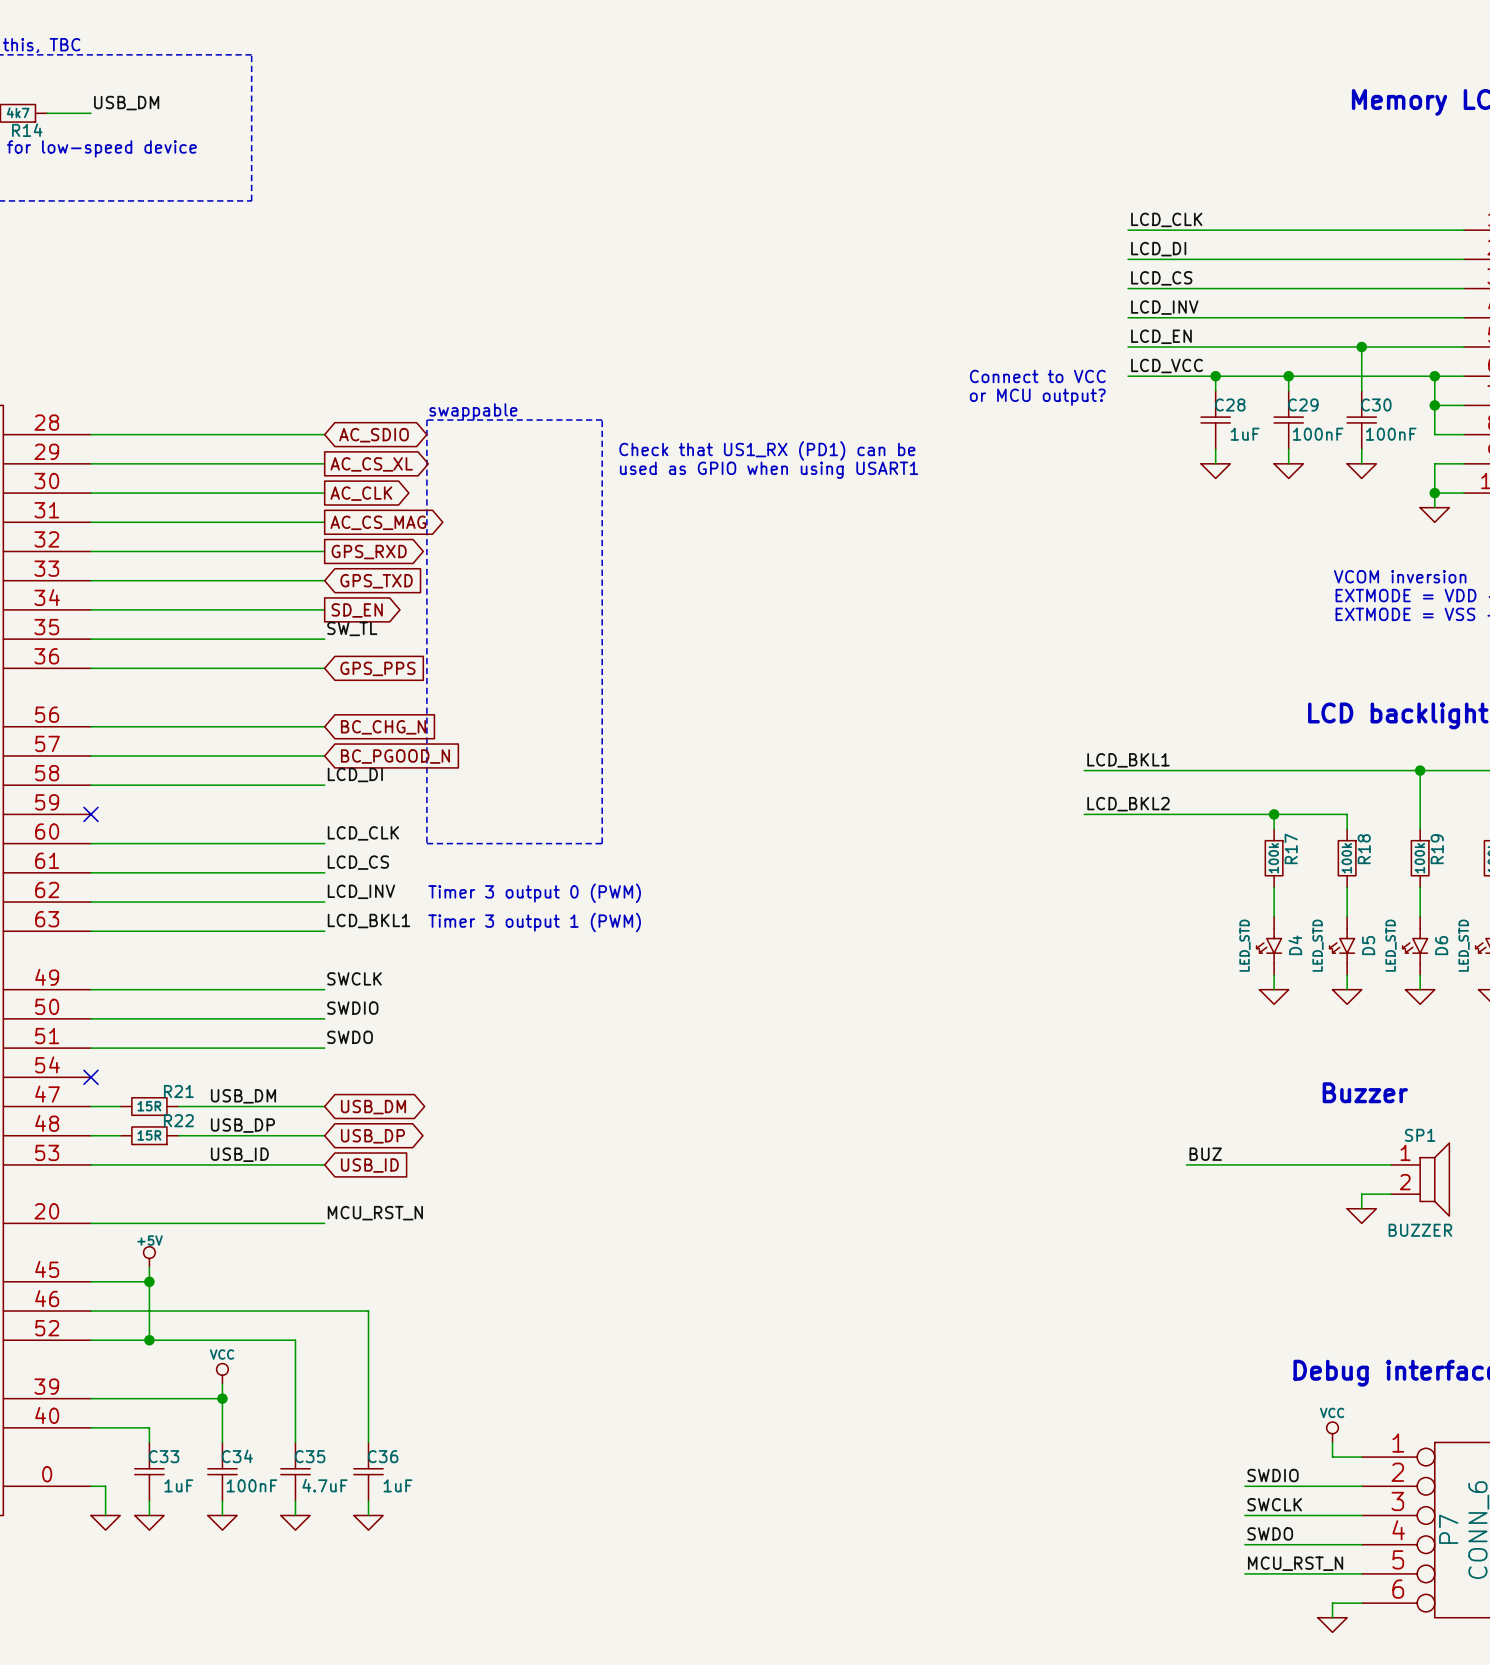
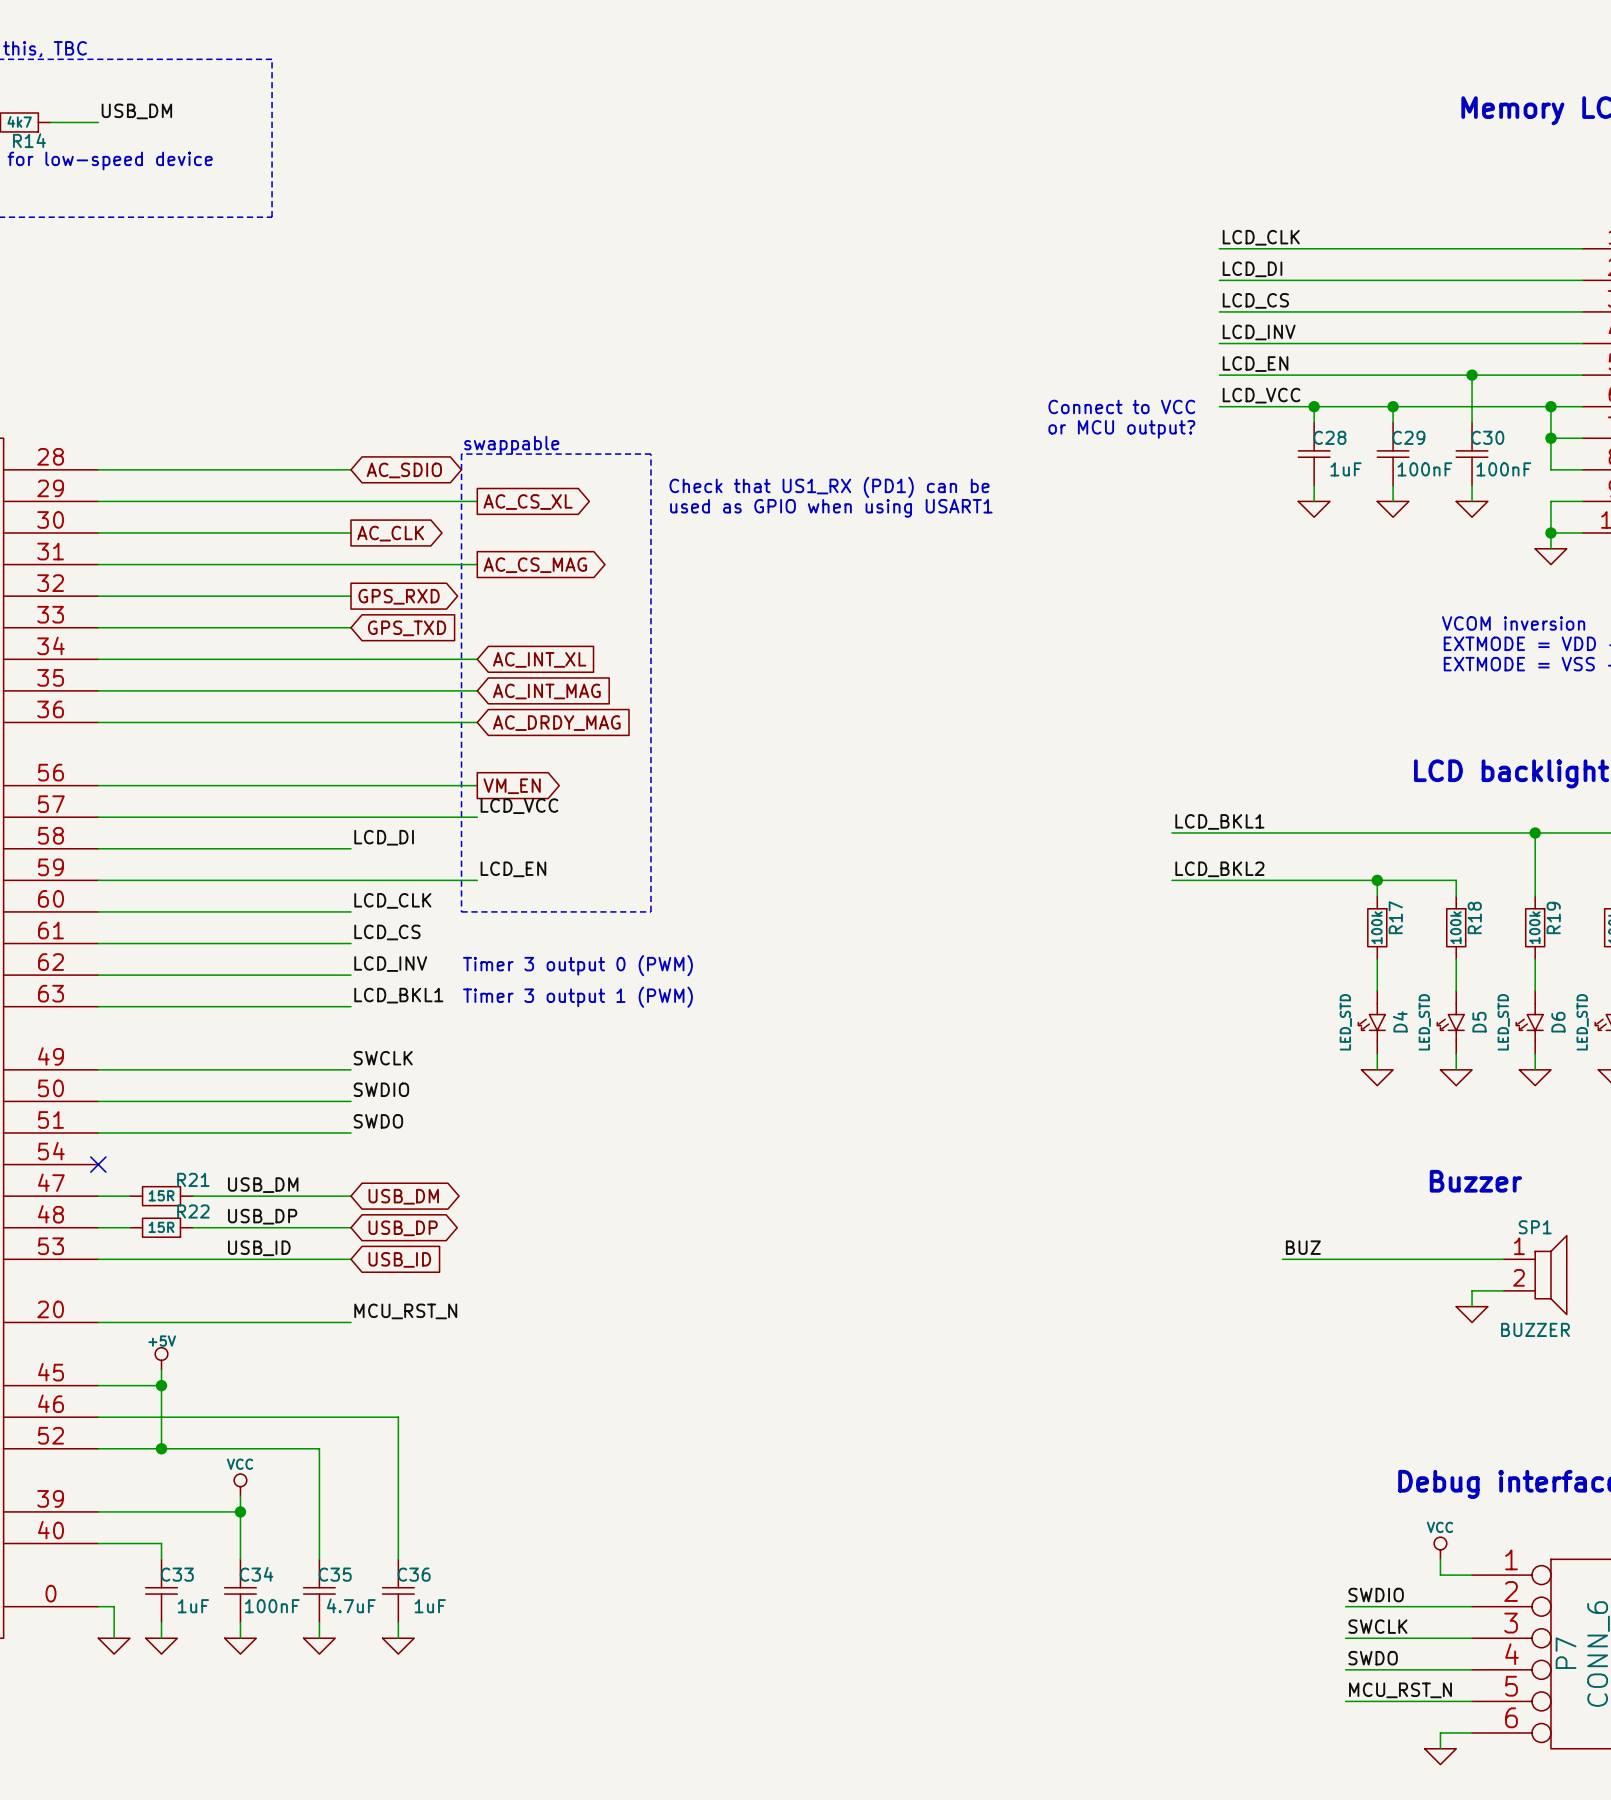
wire: none -> (350, 501) (477, 501)
global label position: AC_CS_XL (371, 464) -> AC_CS_XL (528, 502)
wire: none -> (350, 564) (477, 564)
global label position: AC_CS_MAG (378, 522) -> AC_CS_MAG (535, 565)
wire: none -> (350, 659) (477, 659)
global label: SD_EN (357, 610) -> none
global label: none -> AC_INT_XL (539, 659)
label: SW_TL (352, 628) -> none
wire: none -> (350, 690) (477, 690)
global label: none -> AC_INT_MAG (546, 691)
wire: none -> (350, 722) (477, 722)
global label: GPS_PPS (377, 668) -> none
global label: none -> AC_DRDY_MAG (556, 723)
wire: none -> (350, 785) (477, 785)
global label: BC_CHG_N (383, 727) -> none
global label: none -> VM_EN (512, 786)
label: none -> LCD_VCC (519, 806)
wire: none -> (350, 817) (477, 817)
global label: BC_PGOOD_N (395, 756) -> none
label: none -> LCD_EN (513, 869)
wire: none -> (98, 880) (477, 880)
no-connect mark: (90, 814) -> none

